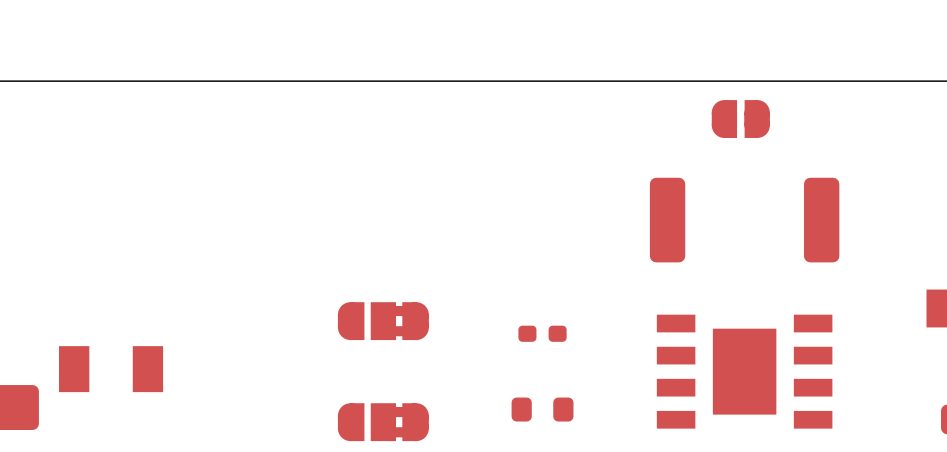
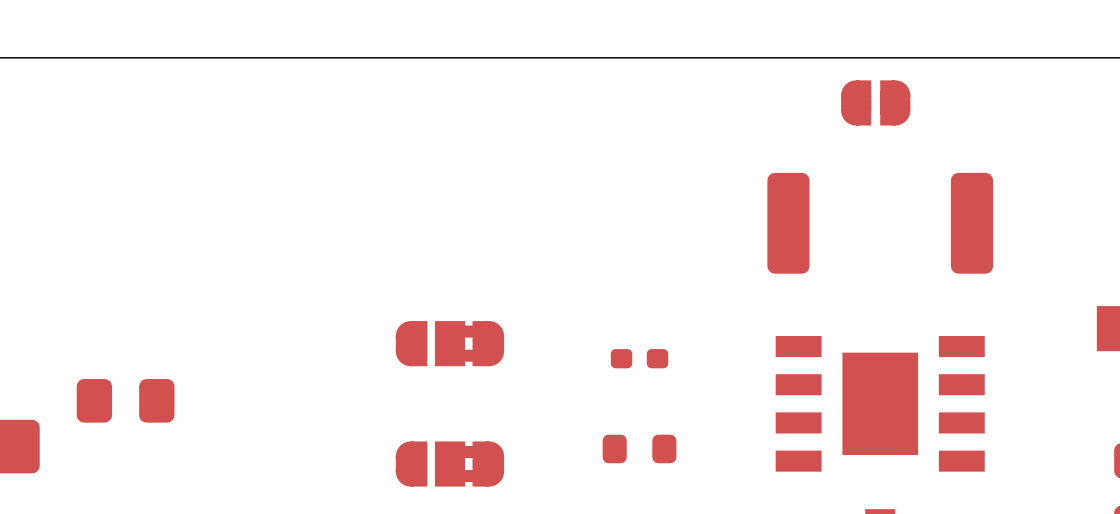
part footprint: [59, 346, 164, 393] -> [76, 379, 175, 423]

